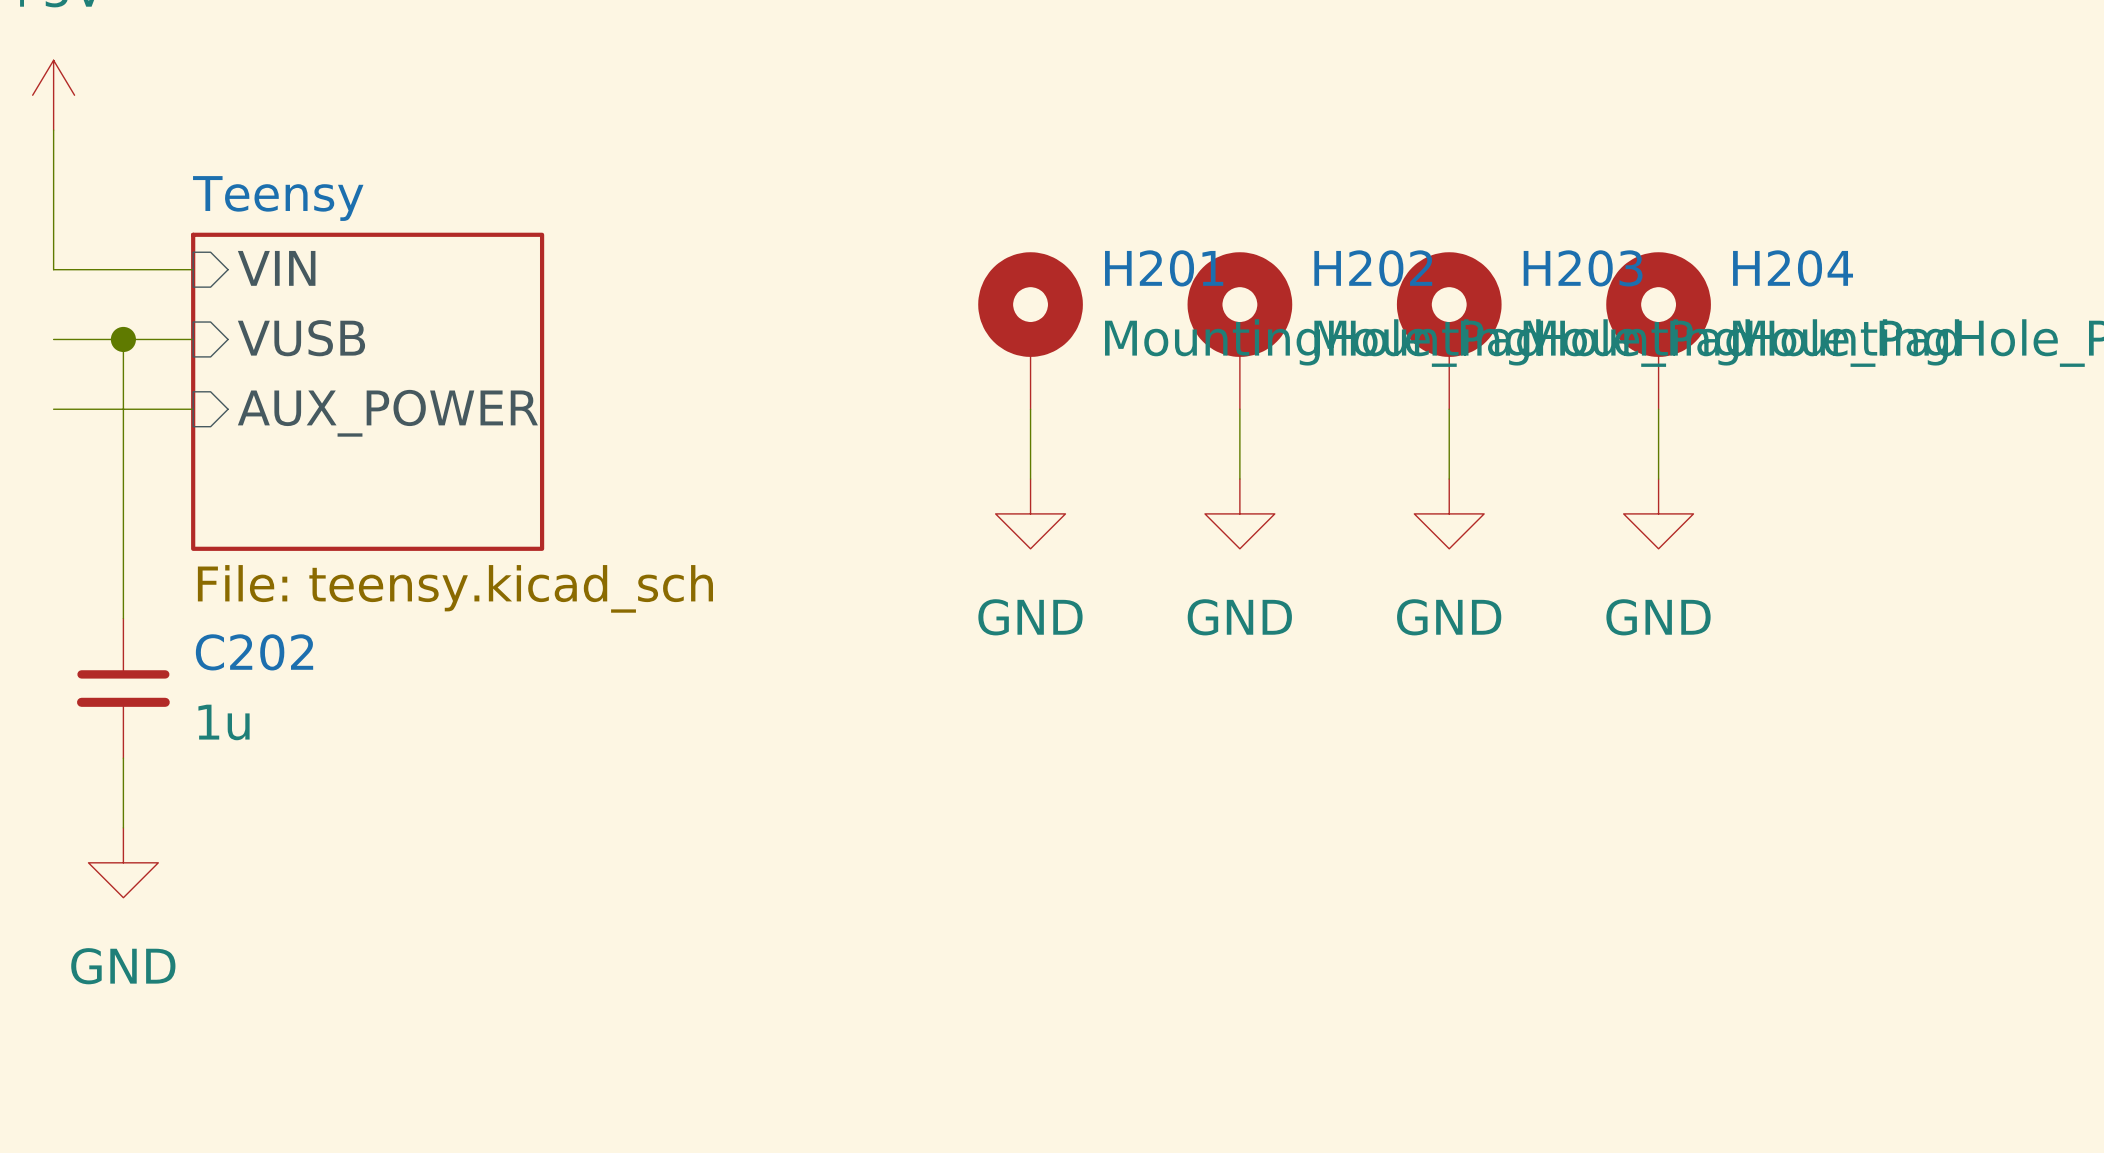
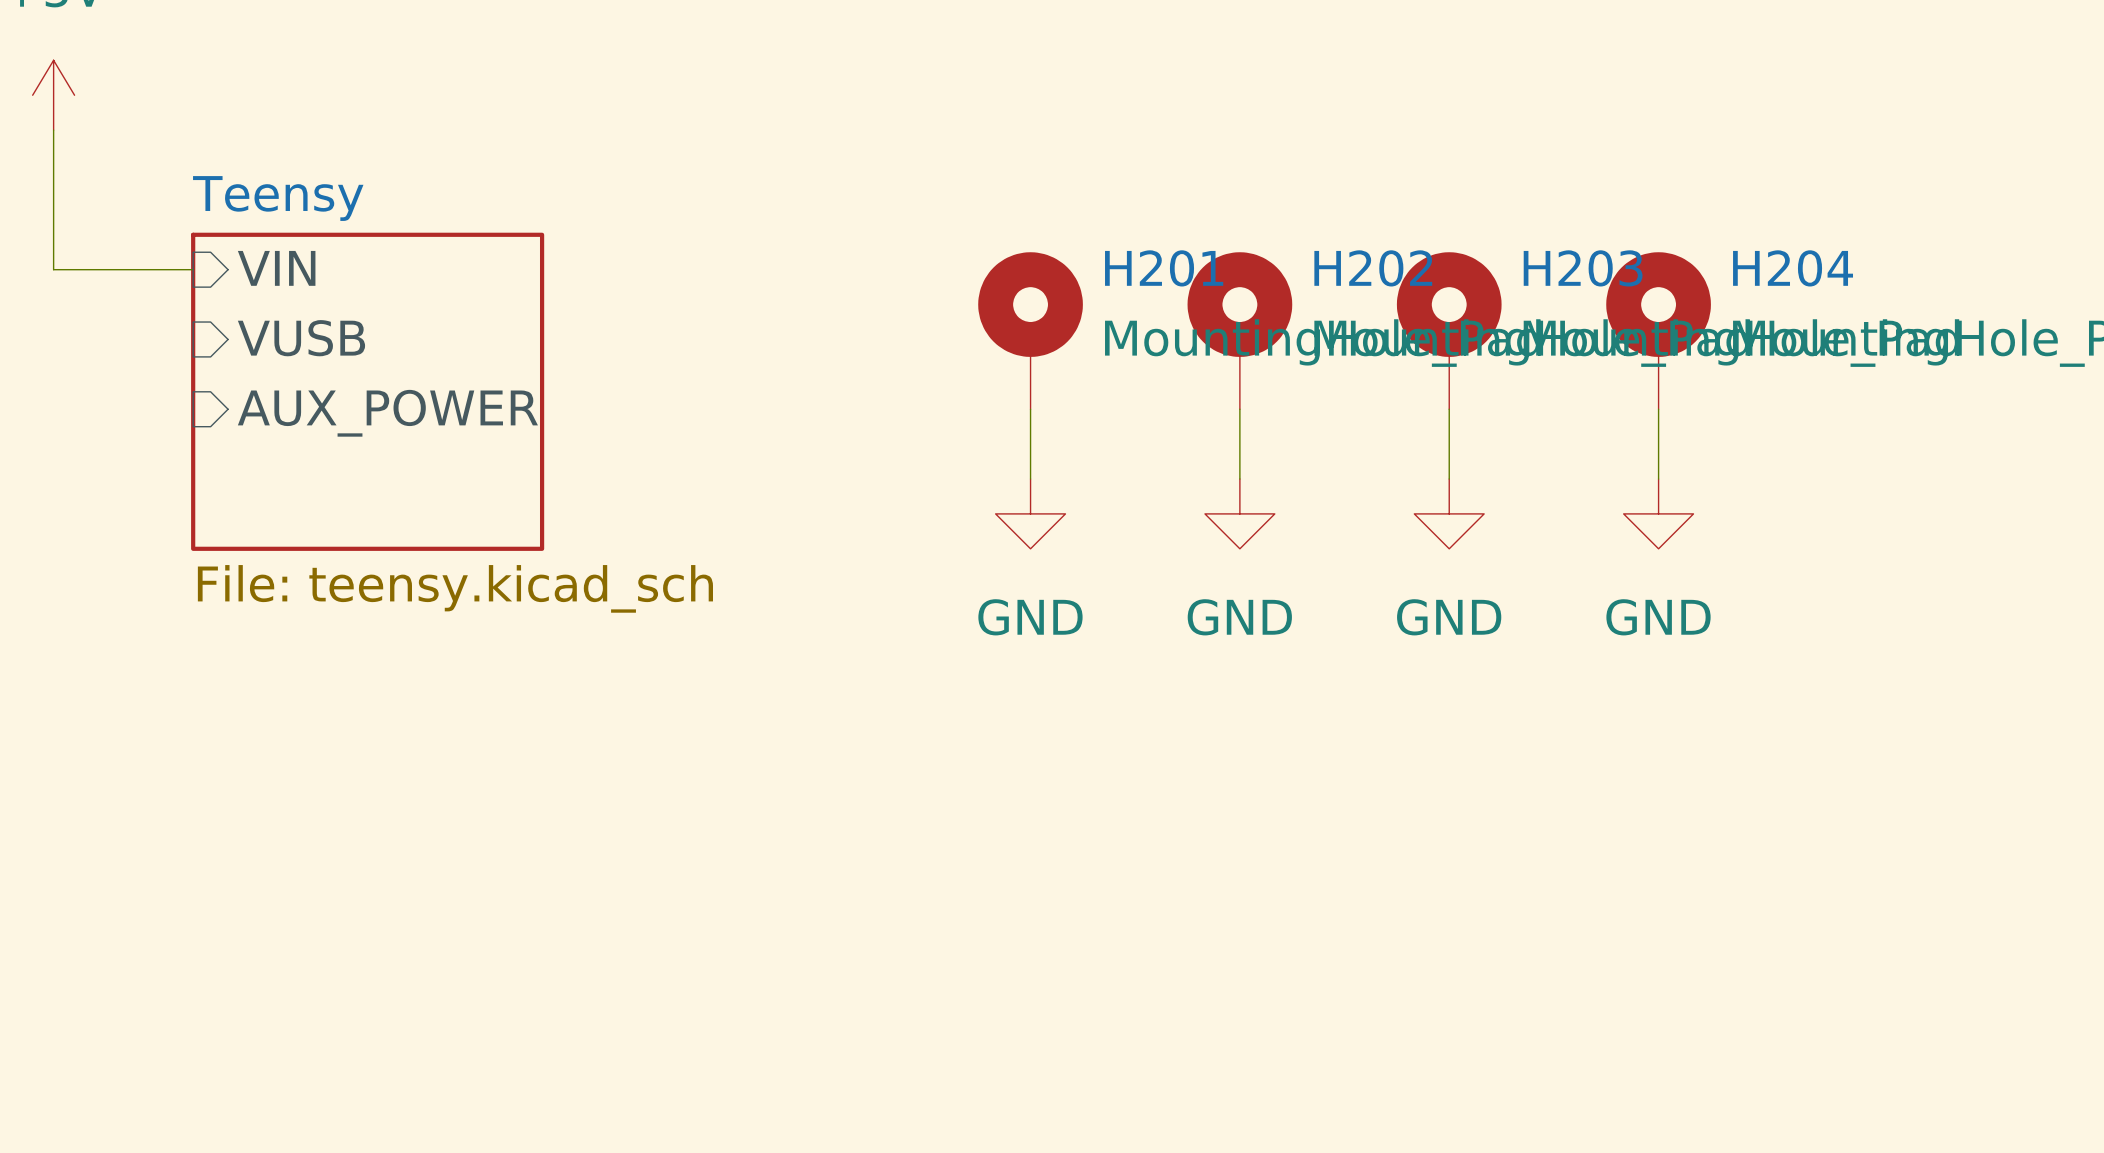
wire: (53, 339) (193, 339) -> none
wire: (123, 339) (123, 618) -> none
junction: (123, 339) -> none
wire: (53, 409) (193, 409) -> none
C202: 1u (123, 688) -> none
wire: (123, 758) (123, 827) -> none
power symbol: GND (123, 862) -> none

